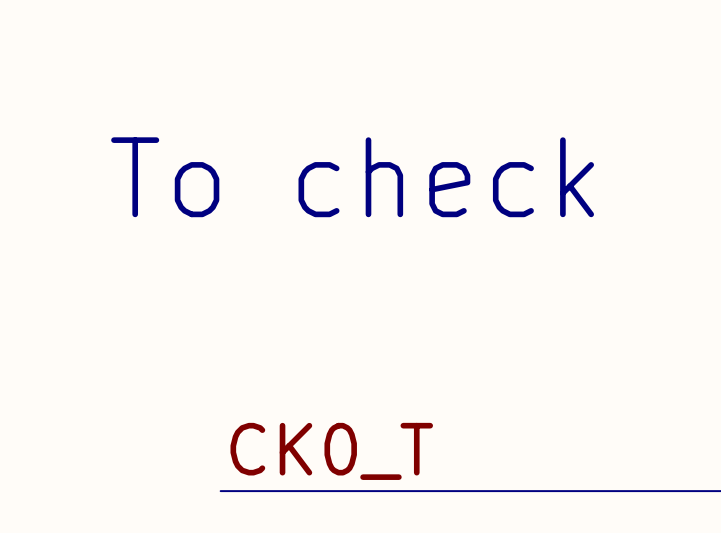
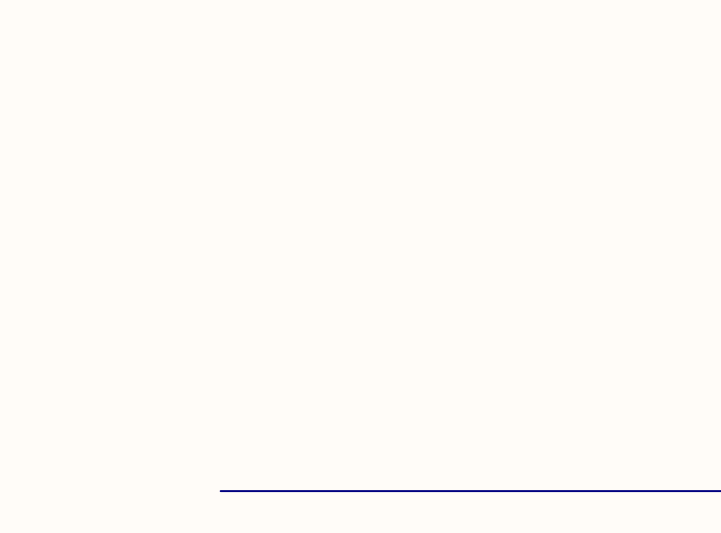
text: To check (352, 177) -> none
label: CK0_T (331, 451) -> none

